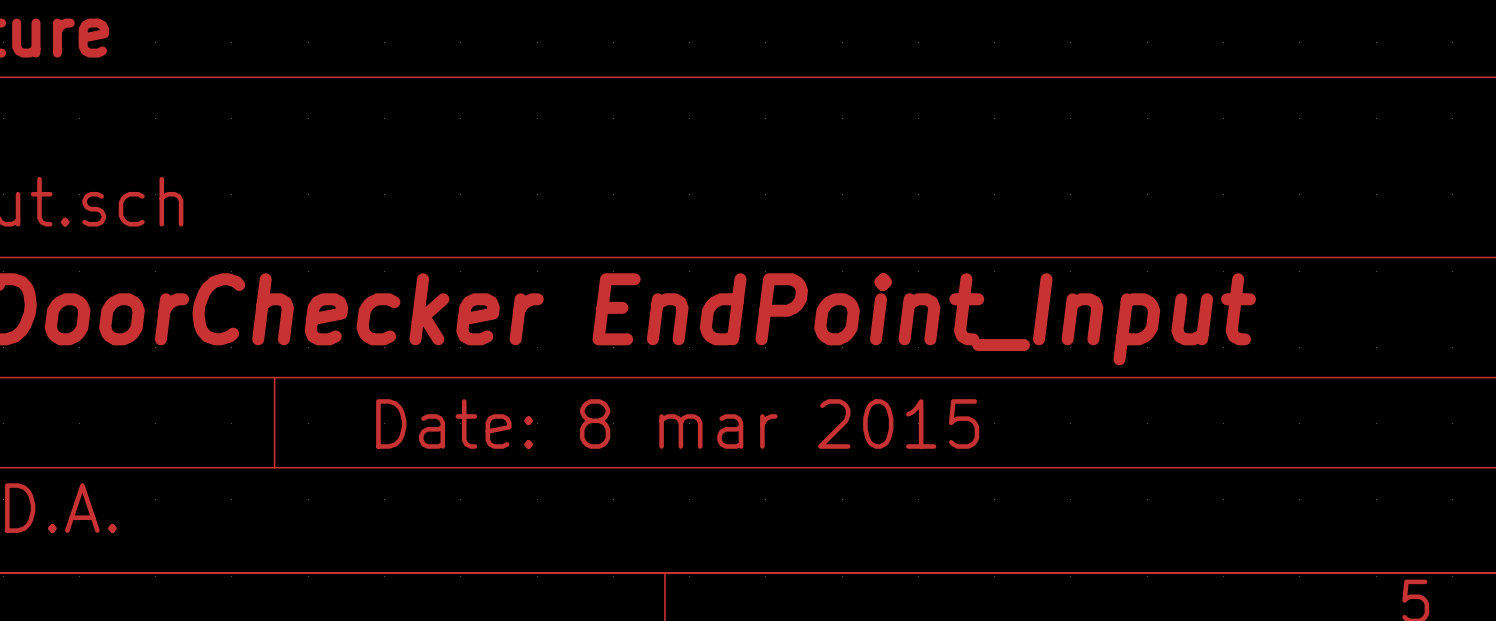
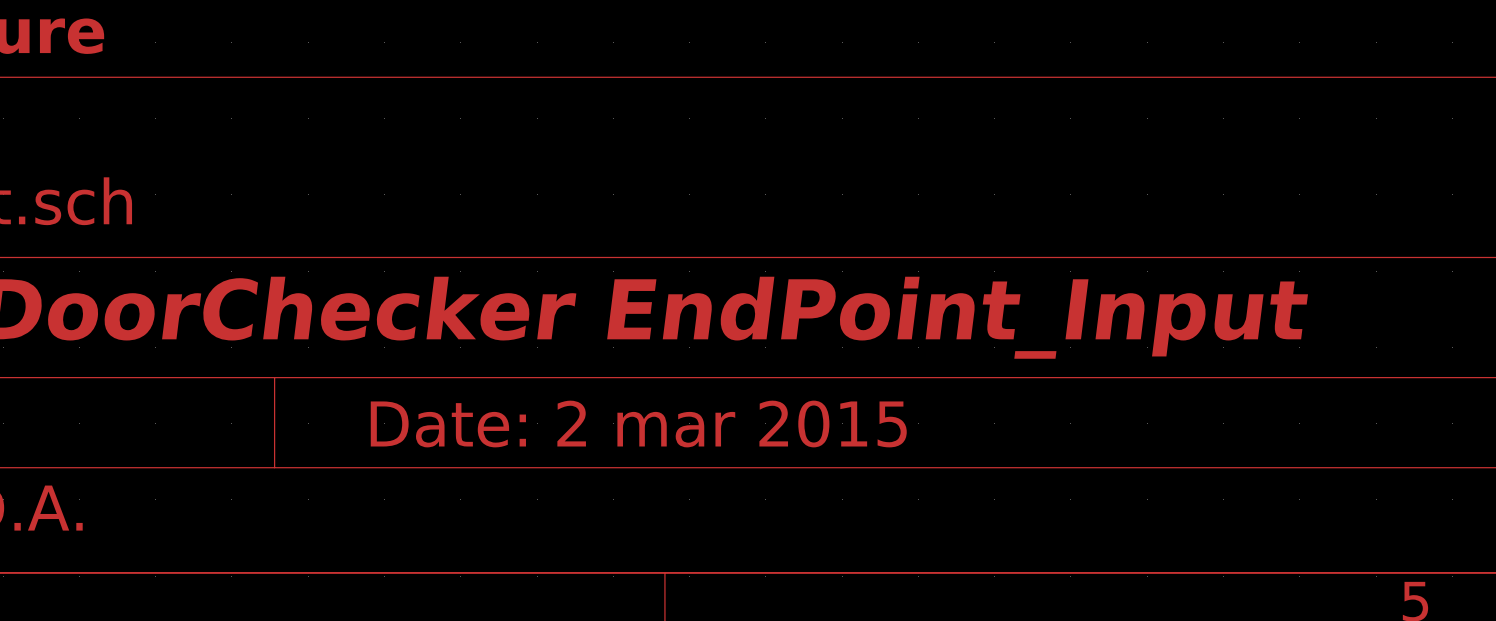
title block: Date: 8 mar 2015 (677, 423) -> Date: 2 mar 2015 (638, 424)

